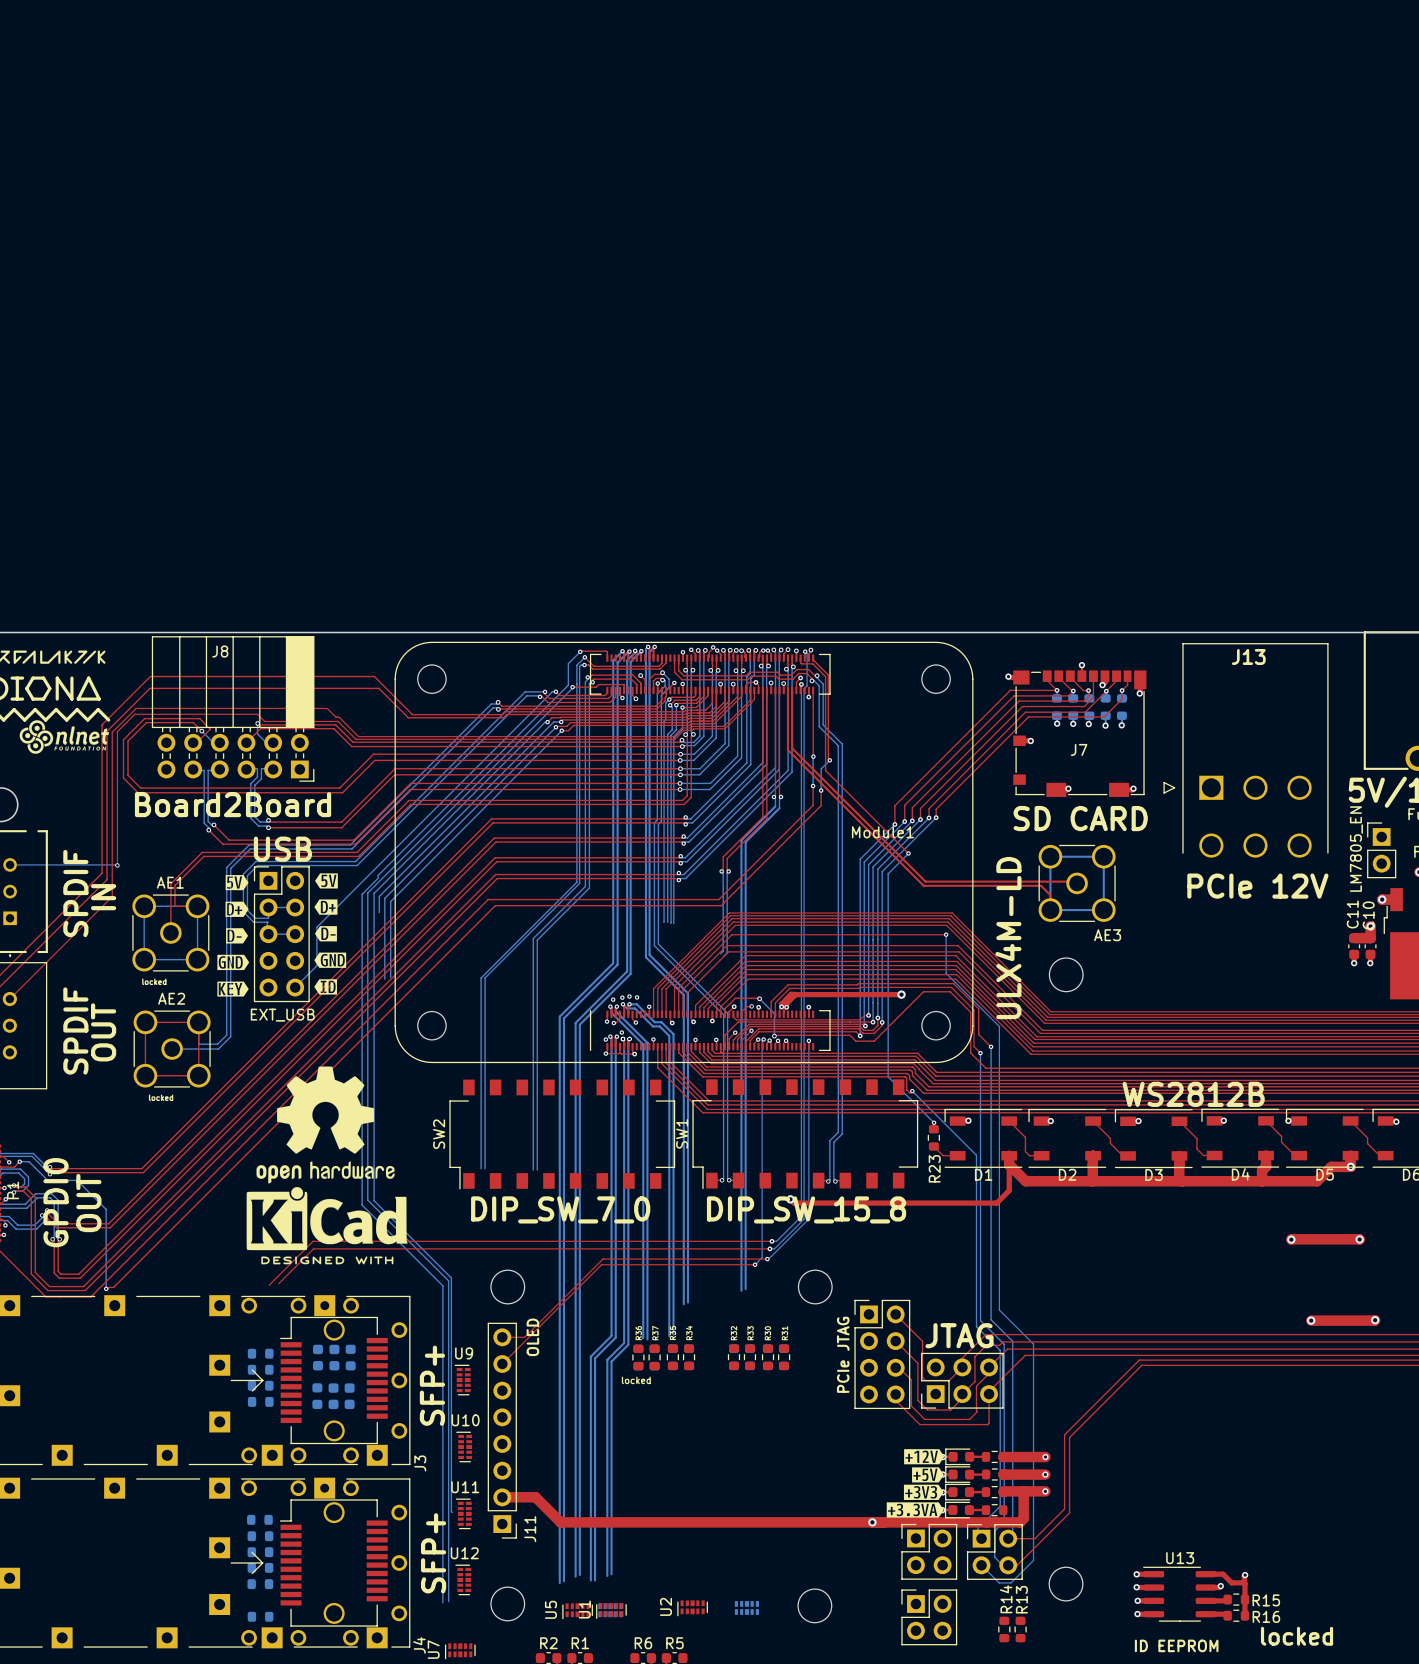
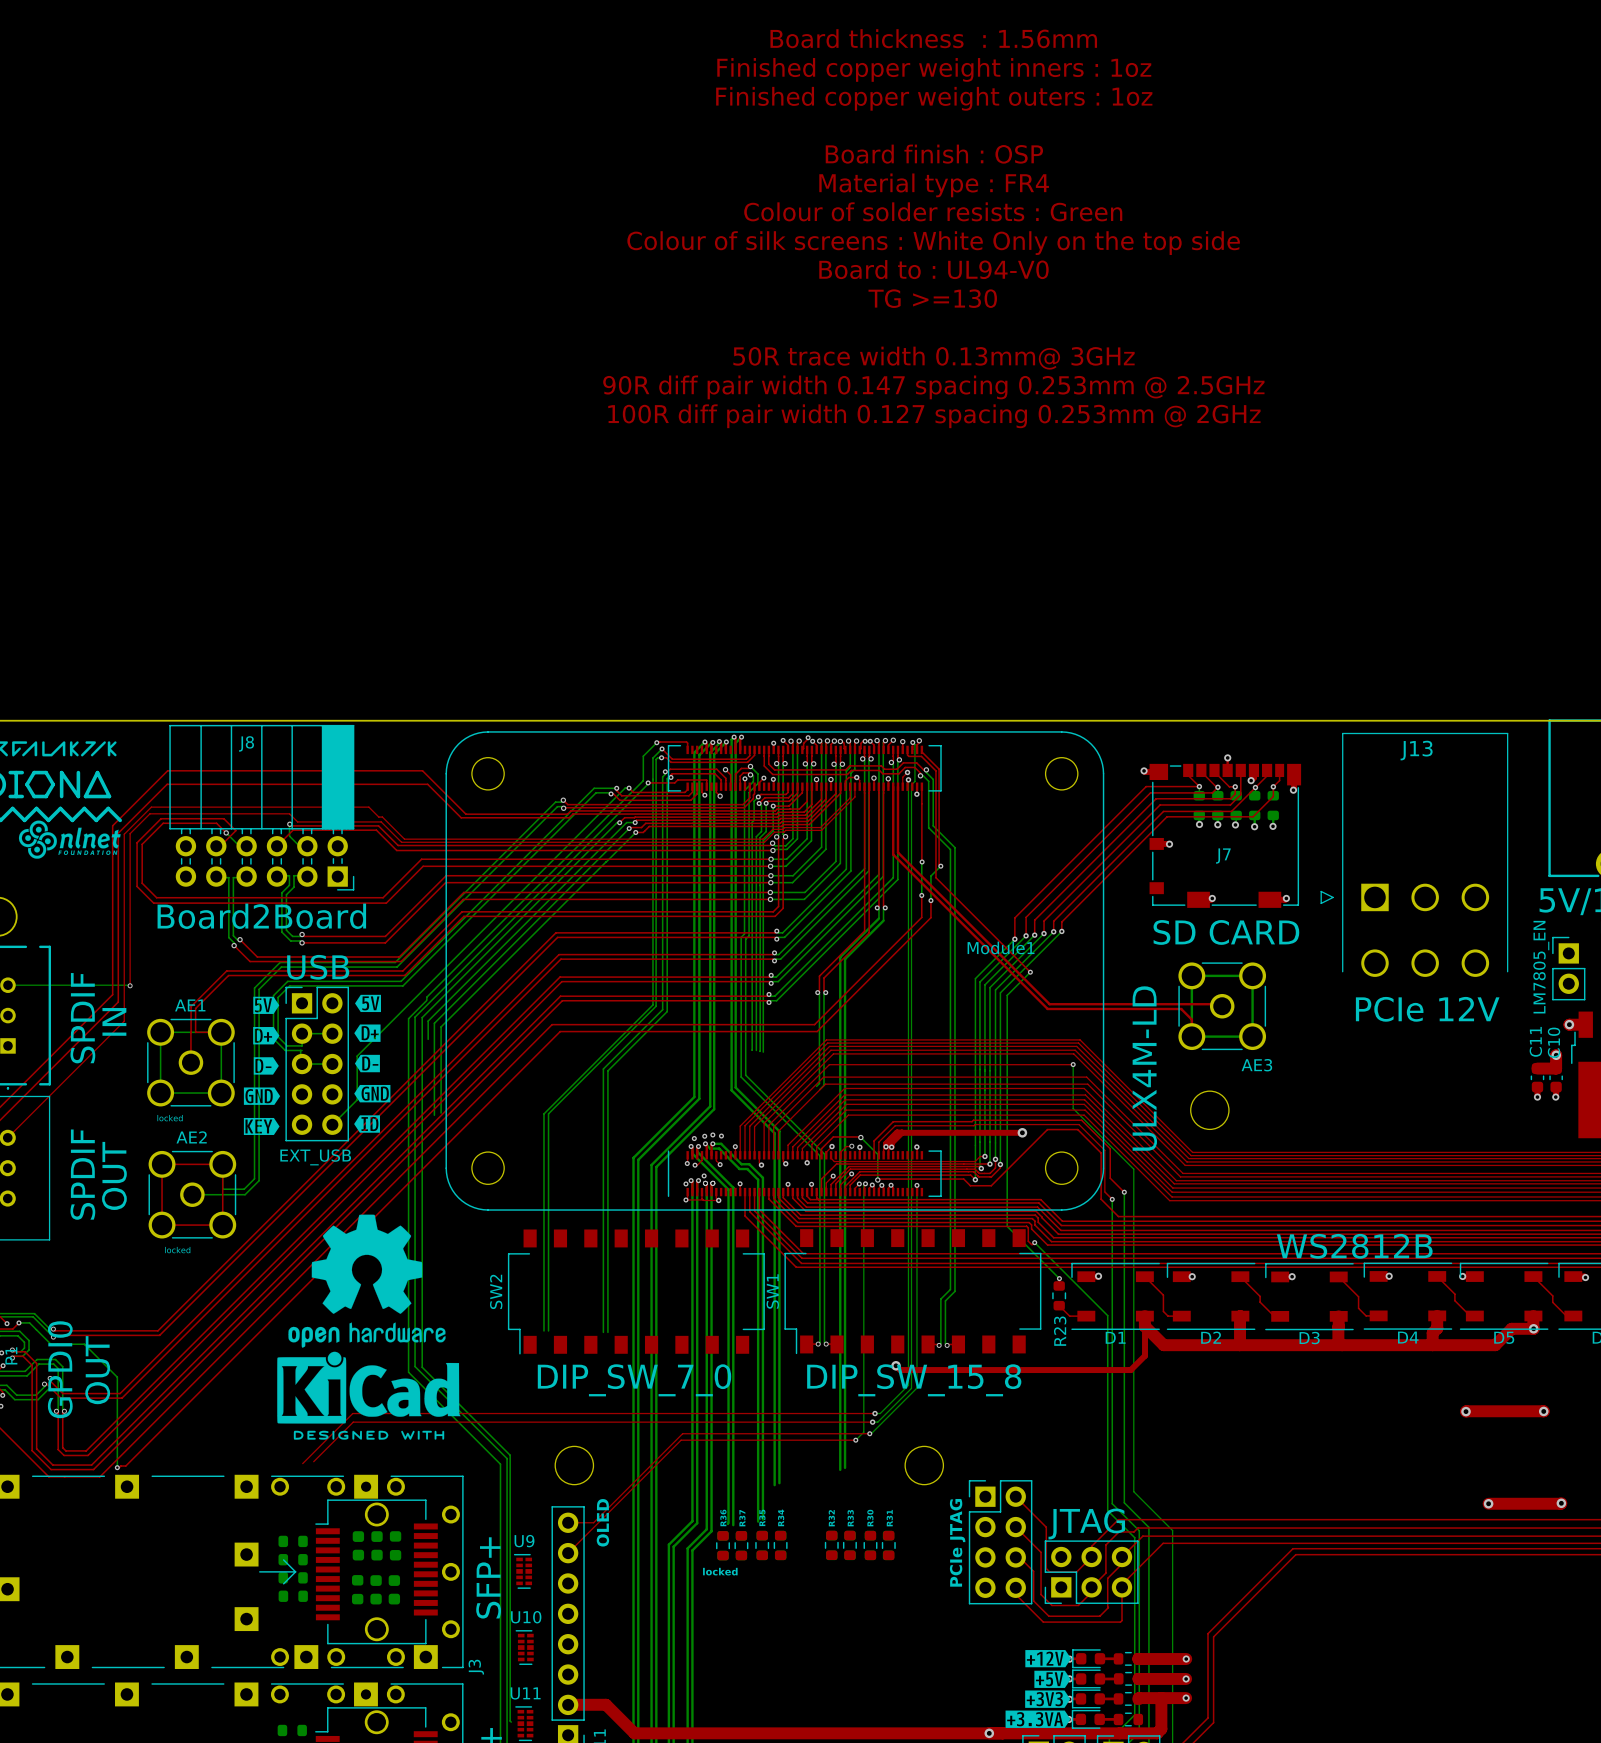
text: none -> Board thickness : 1.56mm (933, 38)
text: none -> Finished copper weight inners : 1oz (934, 69)
text: none -> Finished copper weight outers : 1oz (934, 98)
text: none -> Board finish : OSP (934, 154)
text: none -> Material type : FR4 (934, 185)
text: none -> Colour of solder resists : Green (933, 211)
text: none -> Colour of silk screens : White Only on the top side (933, 243)
text: none -> Board to : UL94-V0 (933, 269)
text: none -> TG >=130 (932, 298)
text: none -> 50R trace width 0.13mm@ 3GHz (934, 358)
text: none -> 90R diff pair width 0.147 spacing 0.253mm @ 2.5GHz (933, 387)
text: none -> 100R diff pair width 0.127 spacing 0.253mm @ 2GHz (934, 416)

